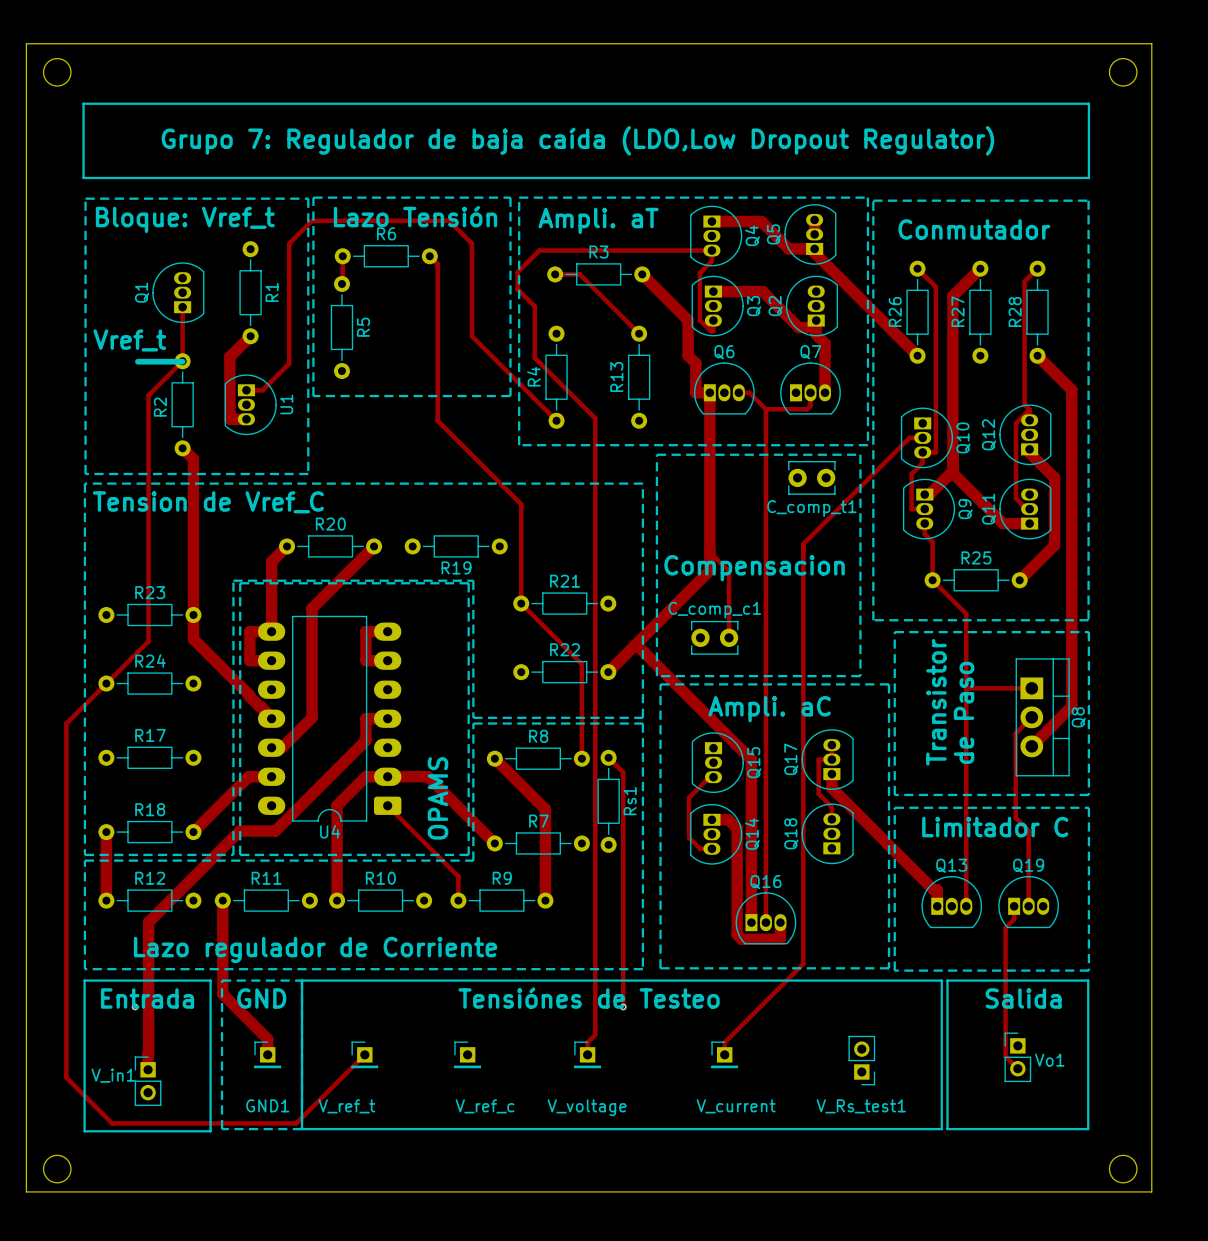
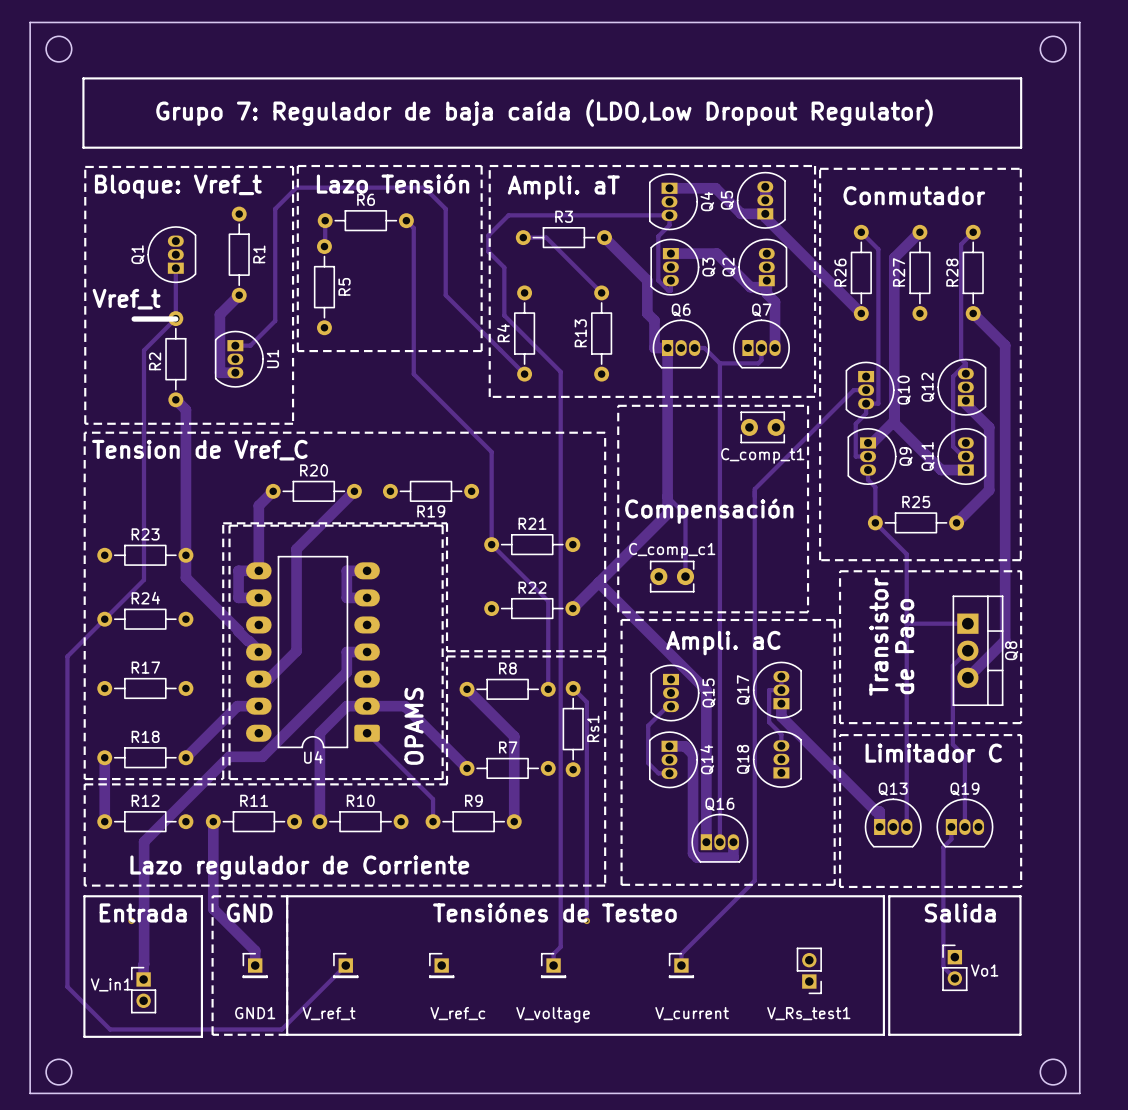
text: Compensacion (754, 568) -> Compensación (709, 511)

